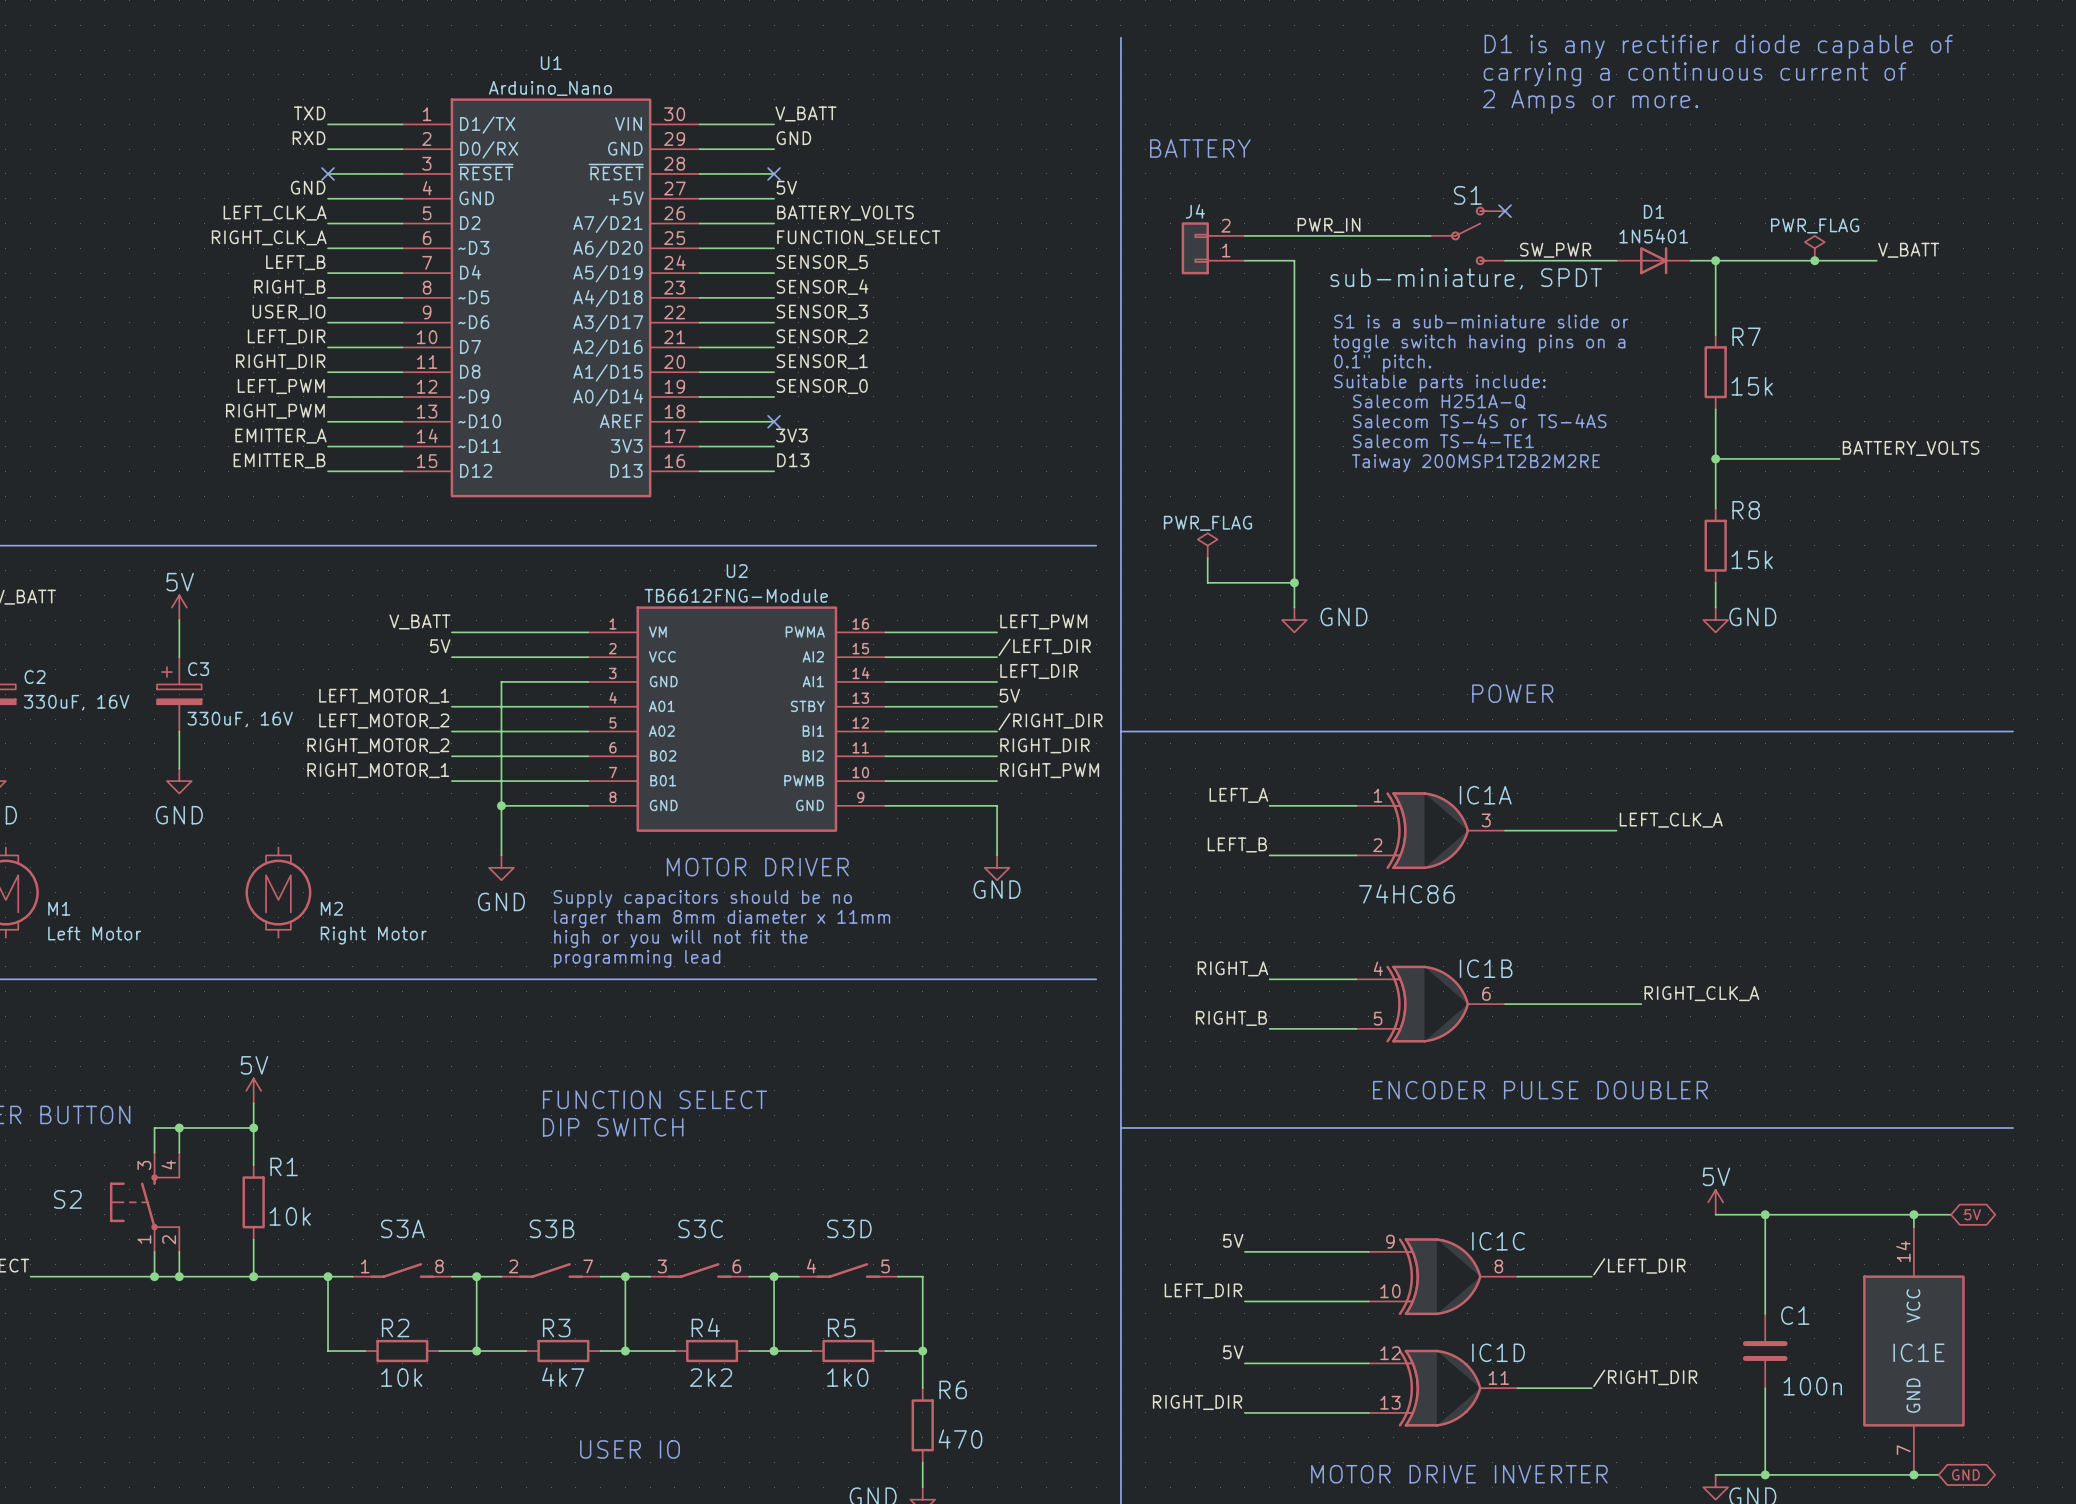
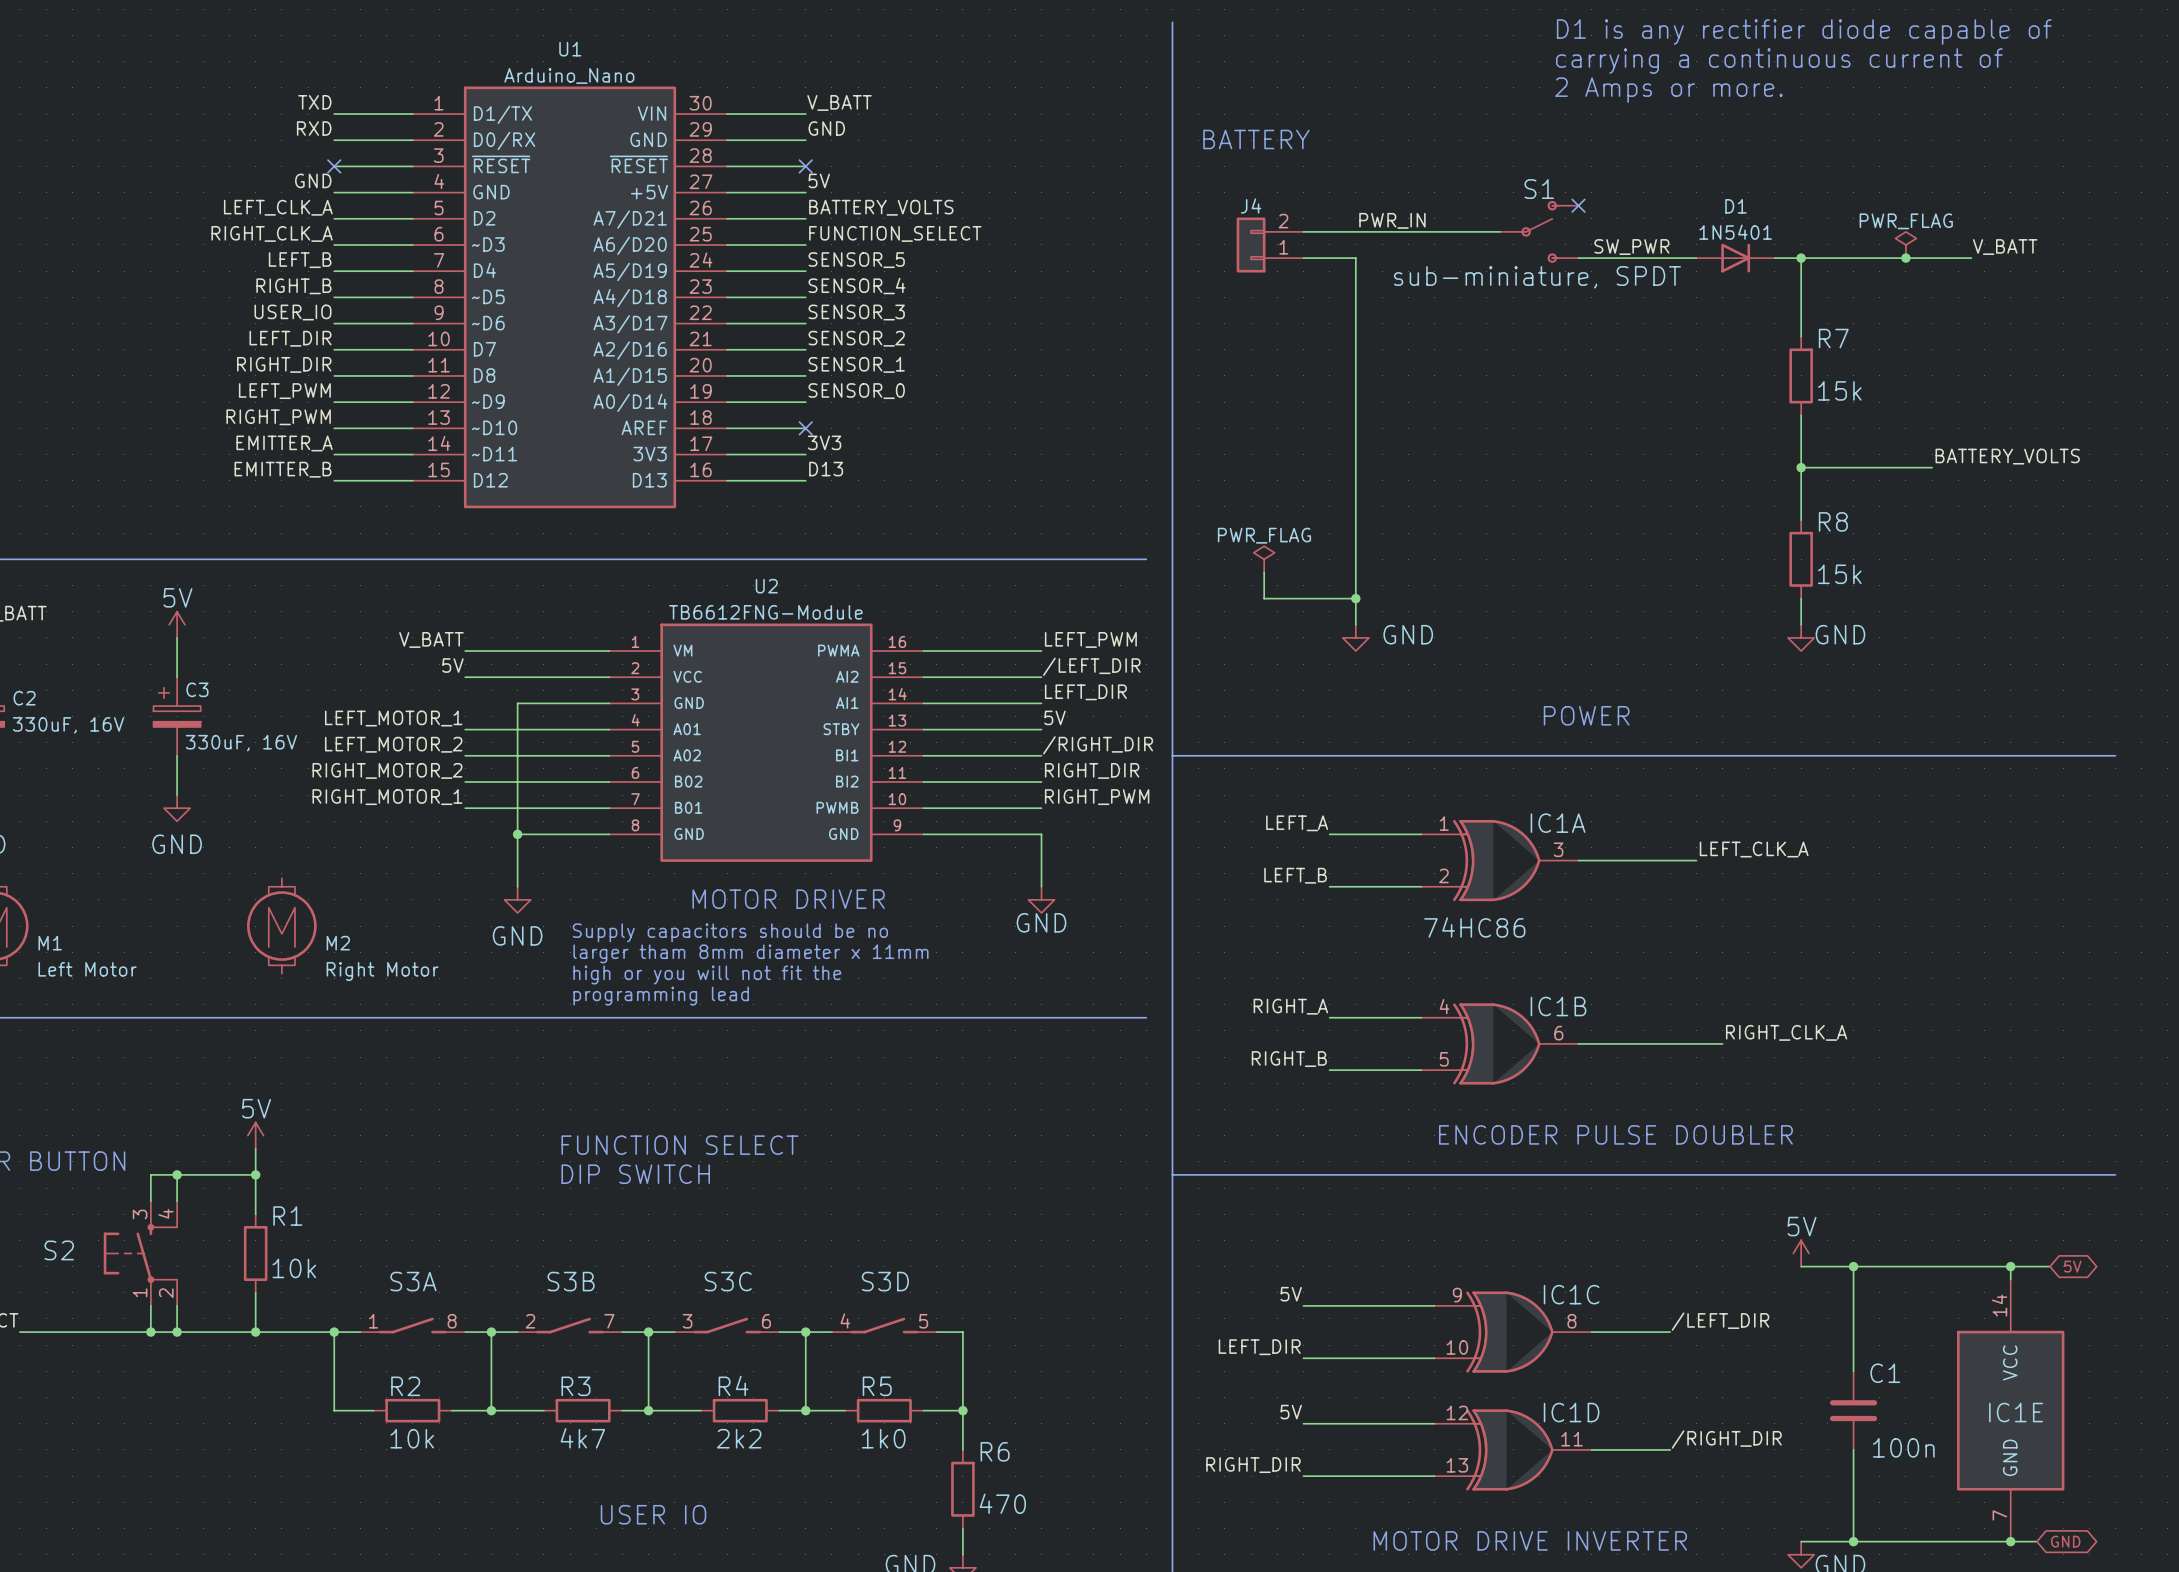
text: S1 is a sub-miniature slide or (1481, 321) -> none
text: toggle switch having pins on a (1479, 343) -> none
text: 0.1" pitch. (1382, 363) -> none
text: Suitable parts include: (1439, 383) -> none
text: Salecom H251A-Q (1439, 401) -> none
text: Salecom TS-4S or TS-4AS (1479, 420) -> none
text: Salecom TS-4-TE1 (1443, 440) -> none
text: Taiway 200MSP1T2B2M2RE (1475, 463) -> none

